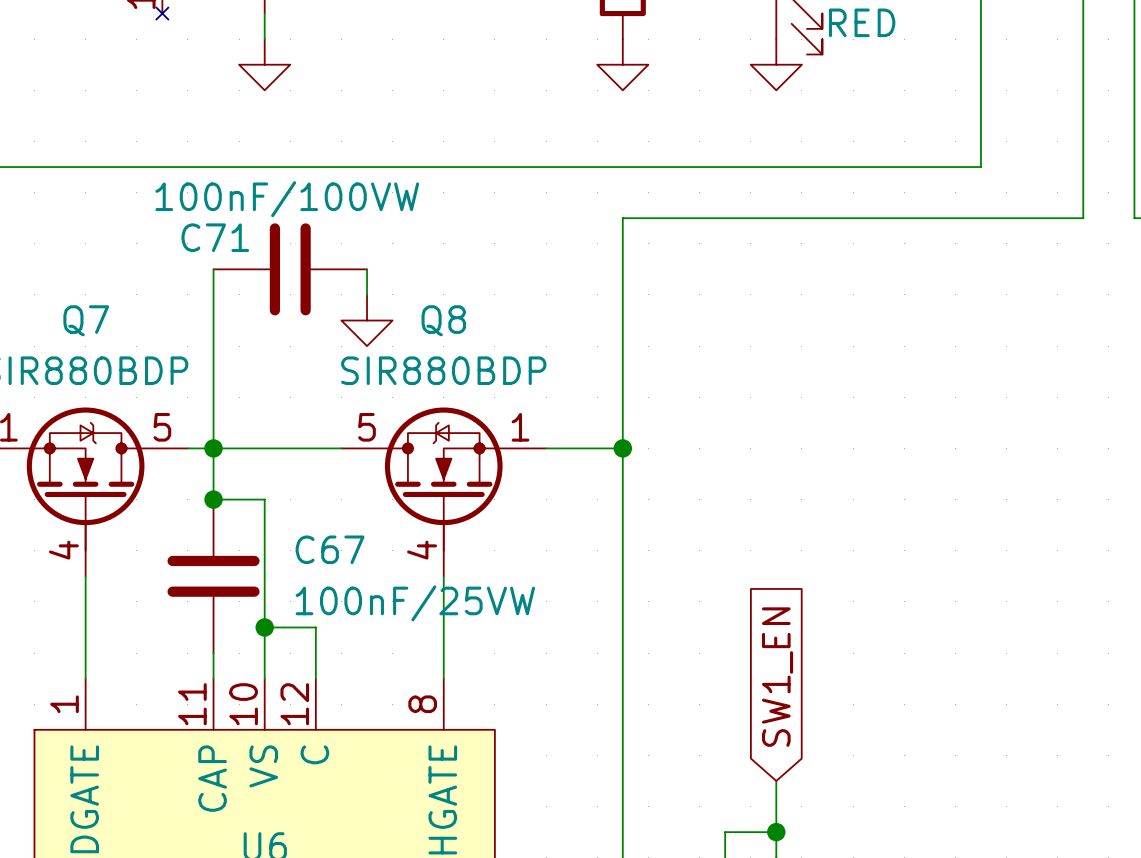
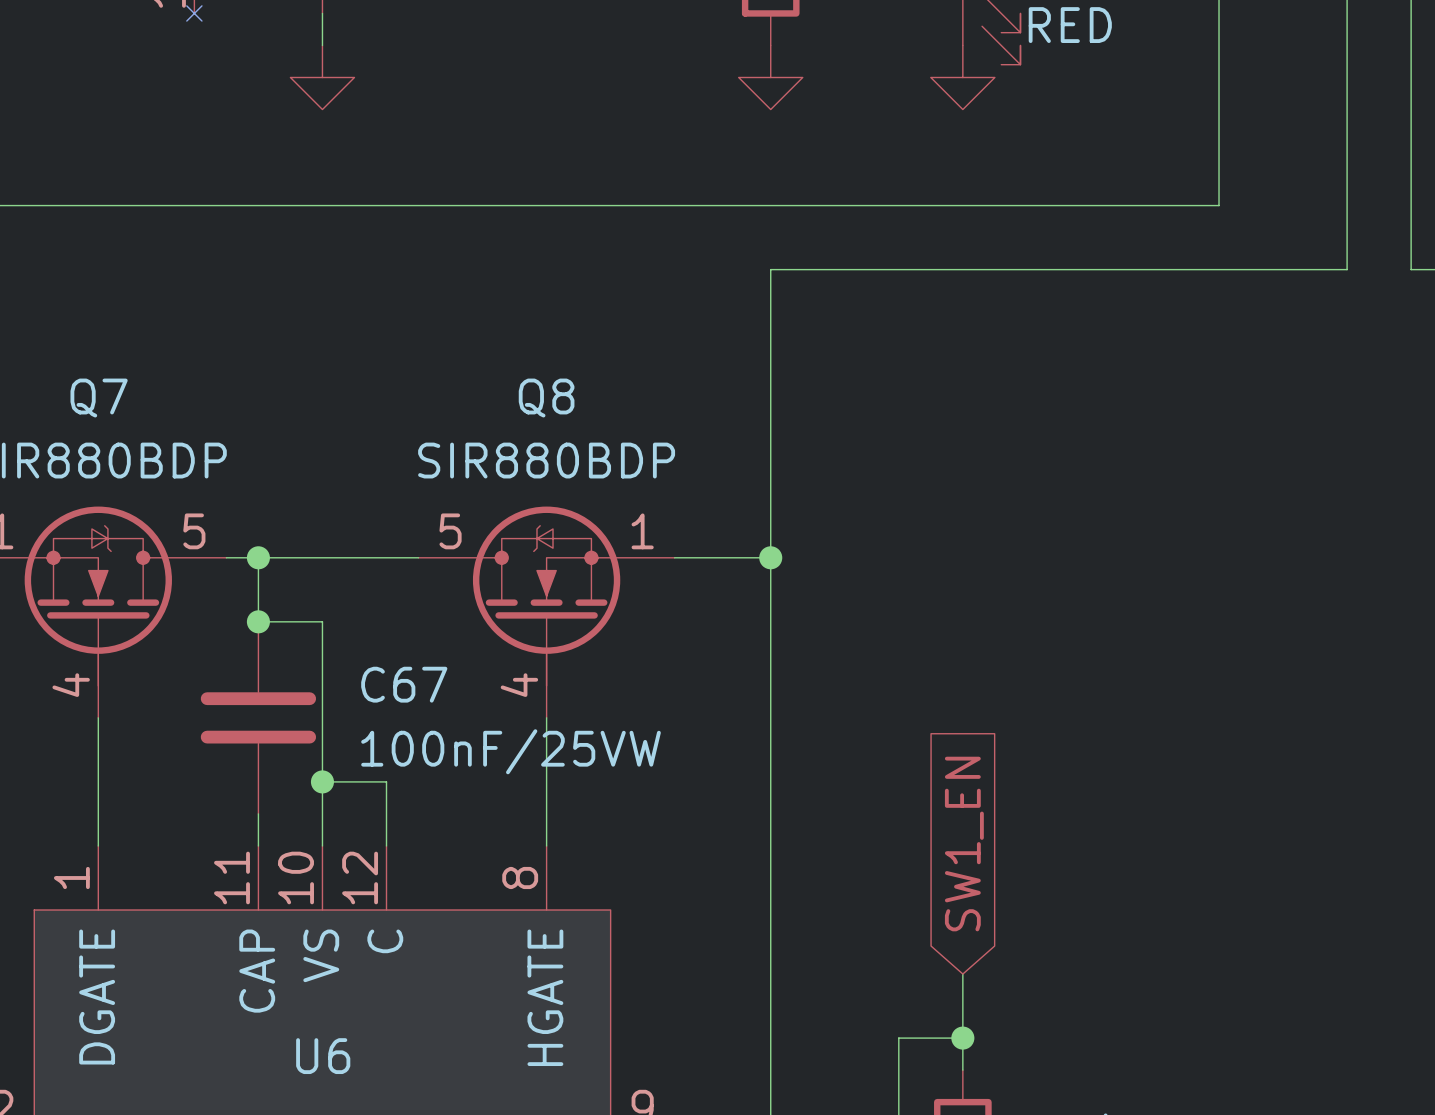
wire: (213, 269) (213, 448) -> none
C71: 100nF/100VW (290, 269) -> none
wire: (367, 269) (367, 294) -> none
power symbol: (367, 320) -> none

